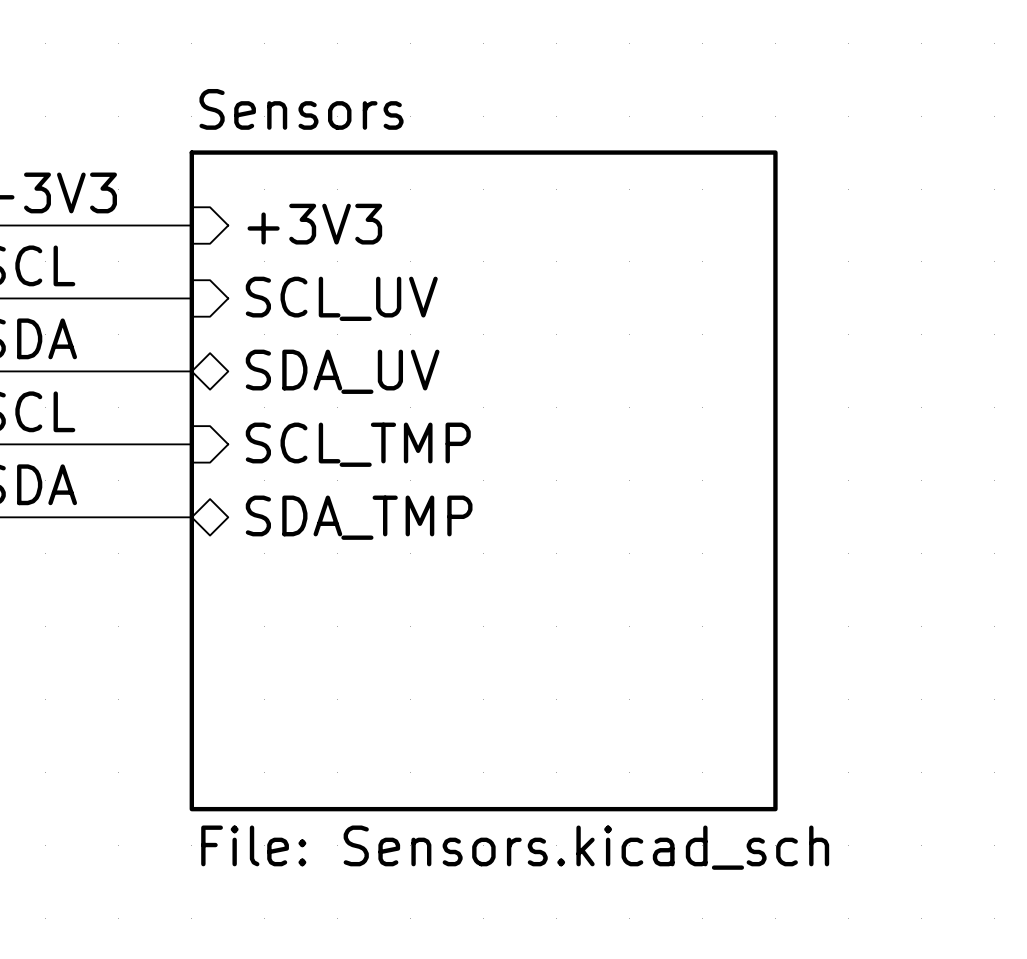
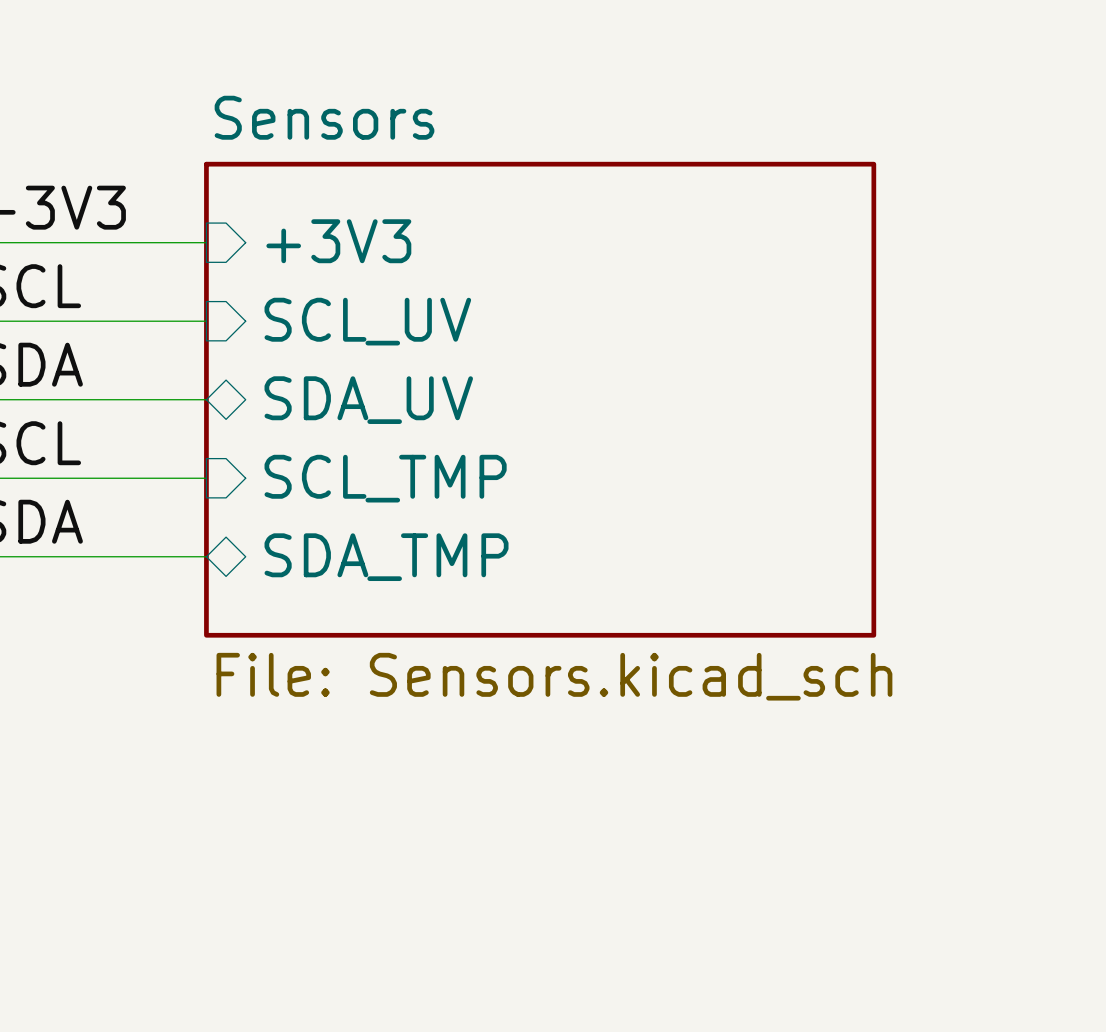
sheet Sensors: none -> File: Sensors.kicad_sch (540, 399)
sheet Sensors: File: Sensors.kicad_sch (483, 480) -> none

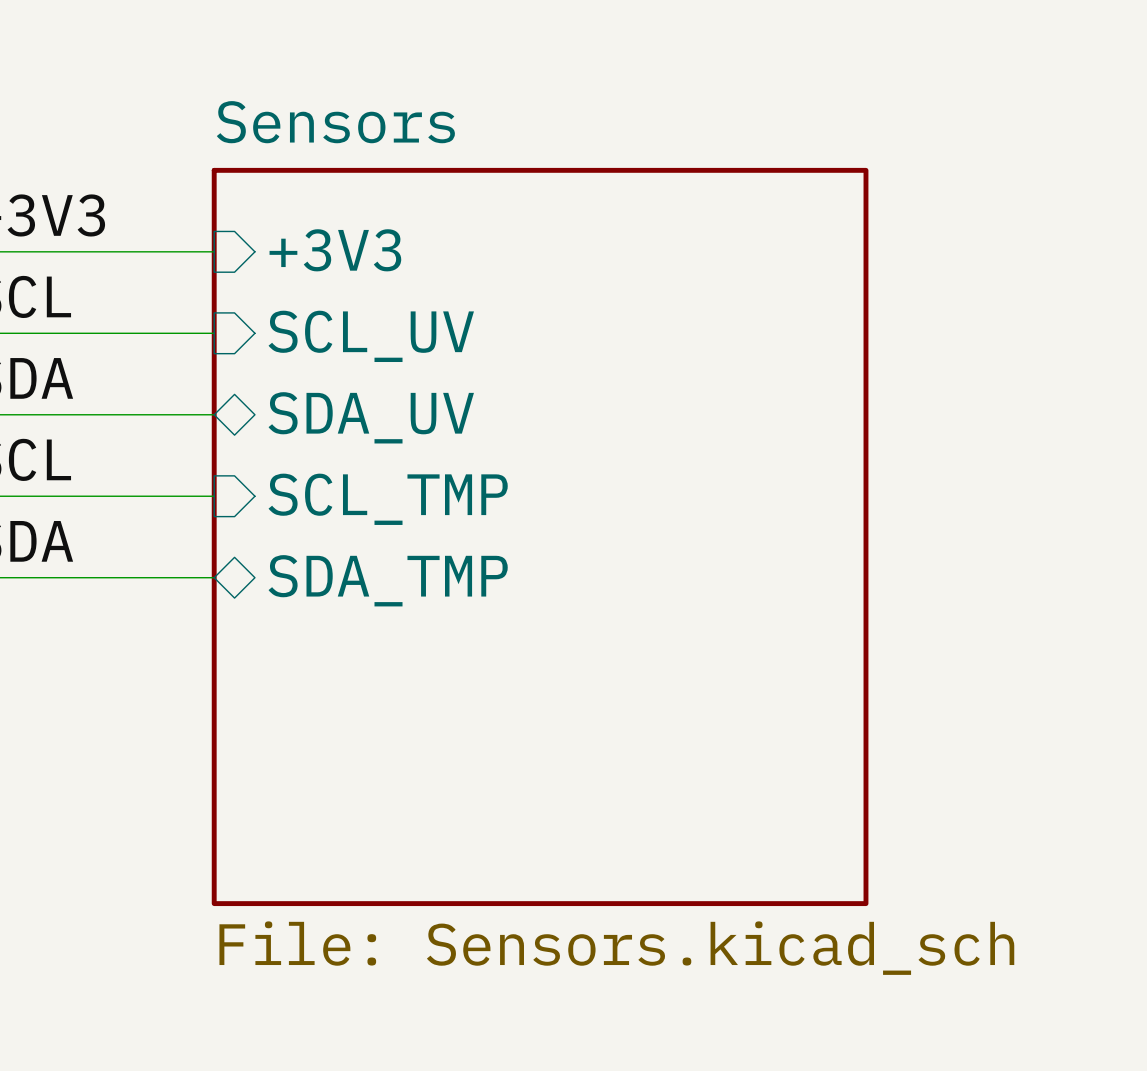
sheet Sensors: File: Sensors.kicad_sch (540, 399) -> none
sheet Sensors: none -> File: Sensors.kicad_sch (540, 536)

